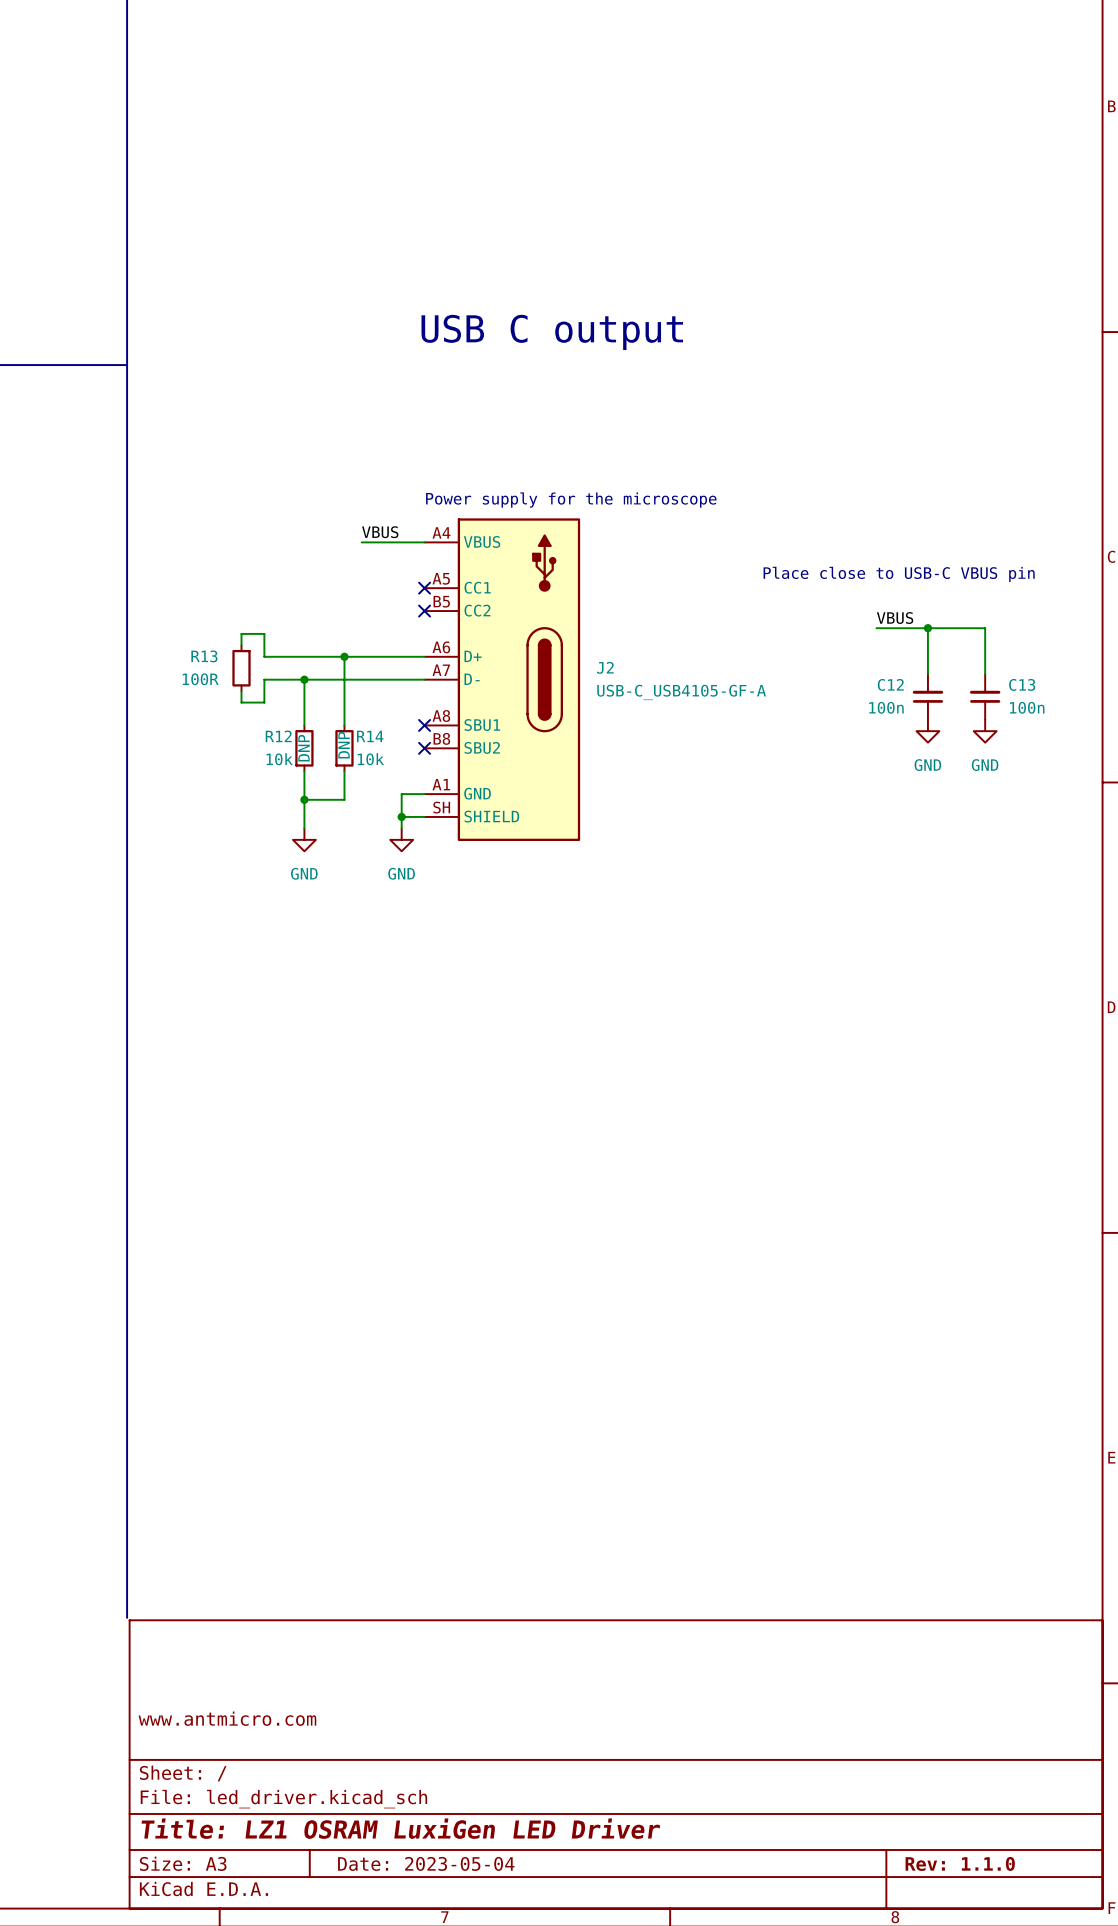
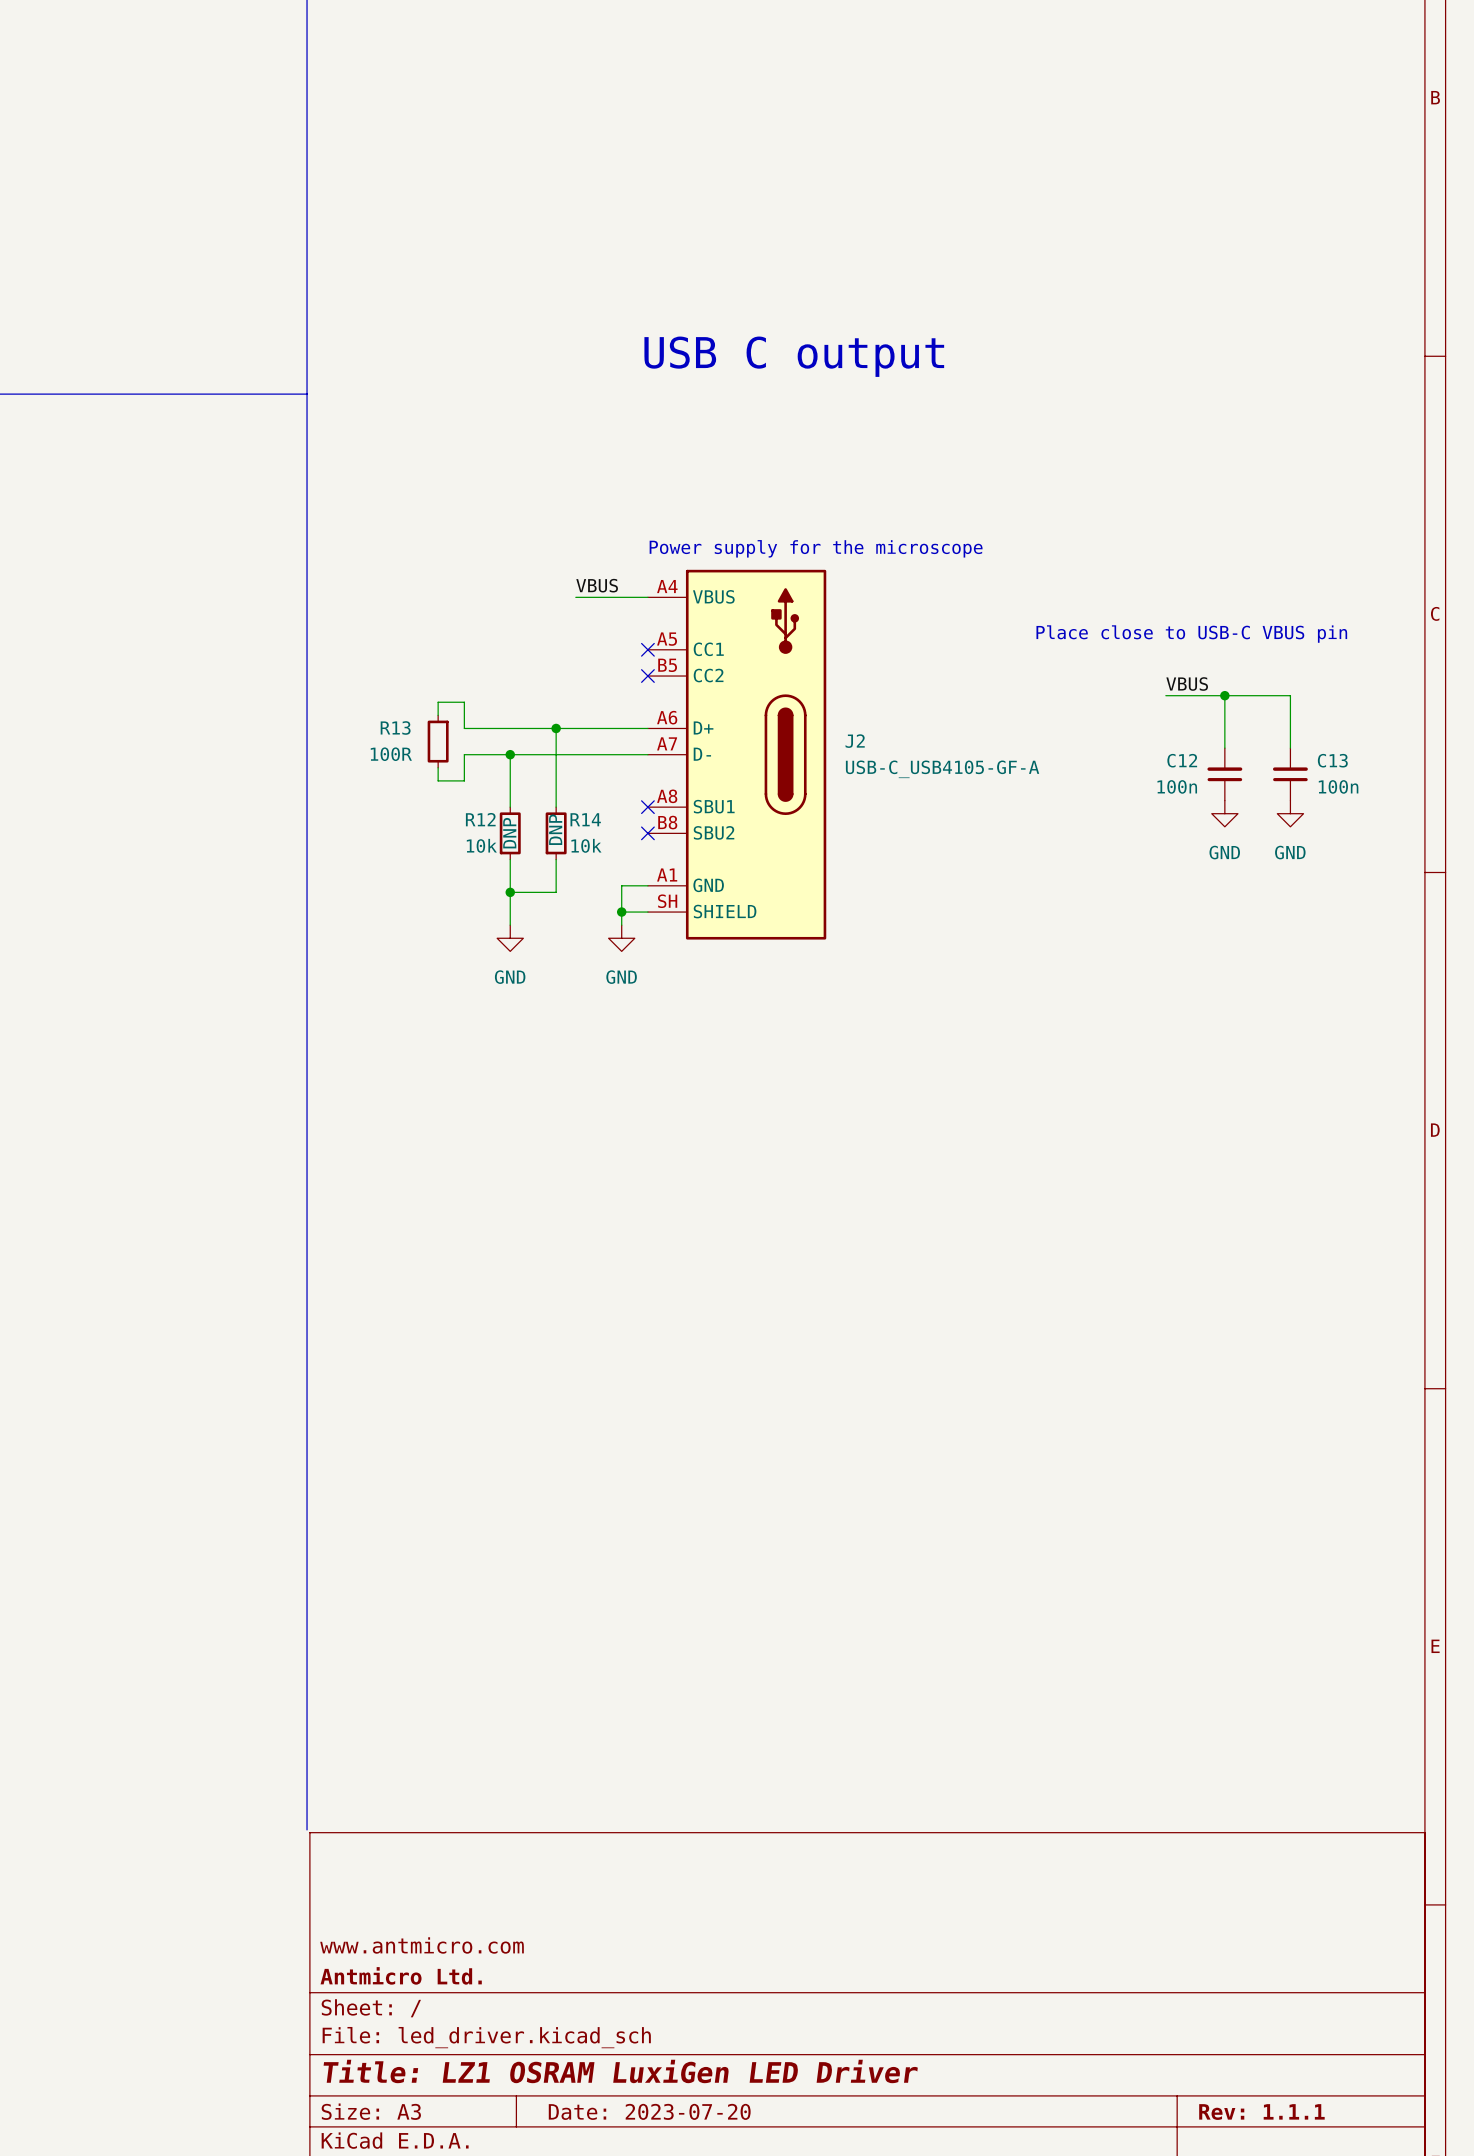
title block: none -> Antmicro Ltd. (401, 1975)
title block: Date: 2023-05-04 (426, 1863) -> Date: 2023-07-20 (649, 2111)
title block: Rev: 1.1.0 (960, 1863) -> Rev: 1.1.1 (1261, 2112)

